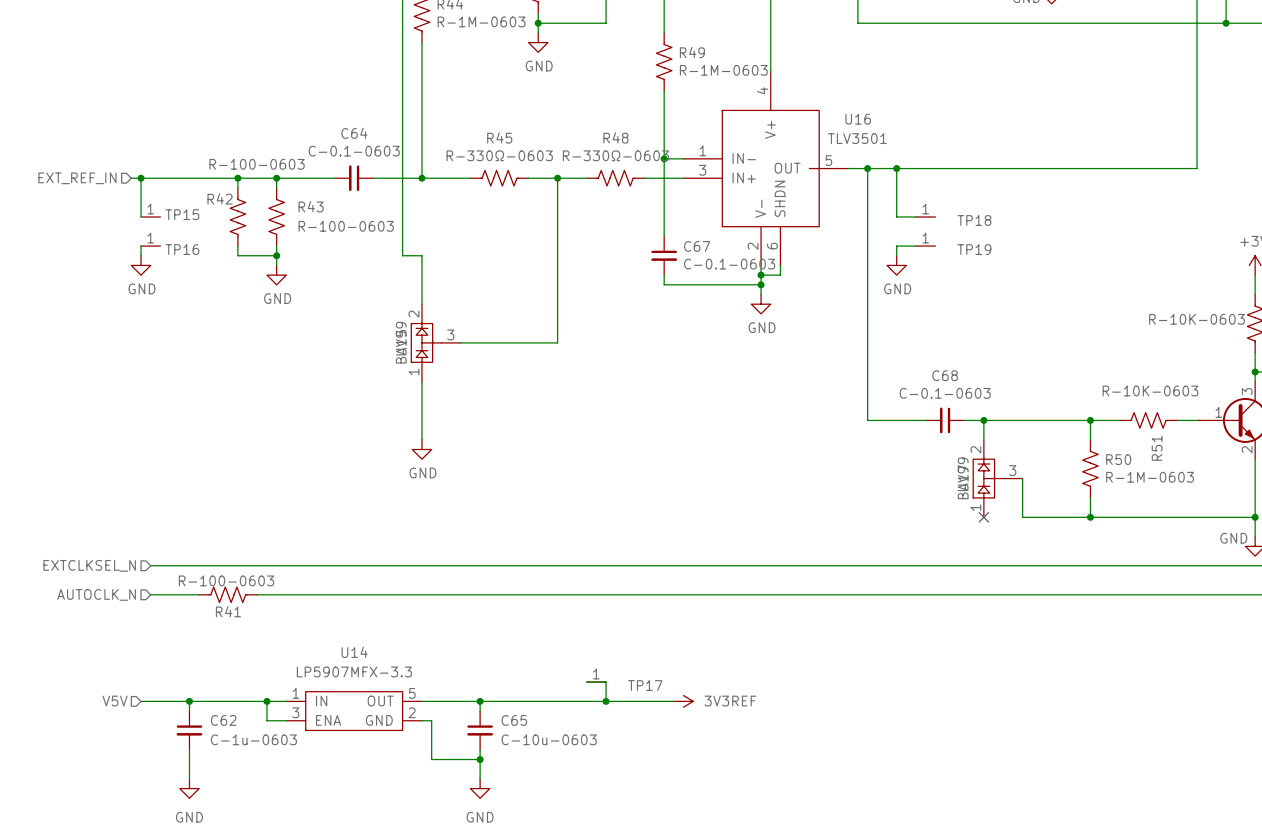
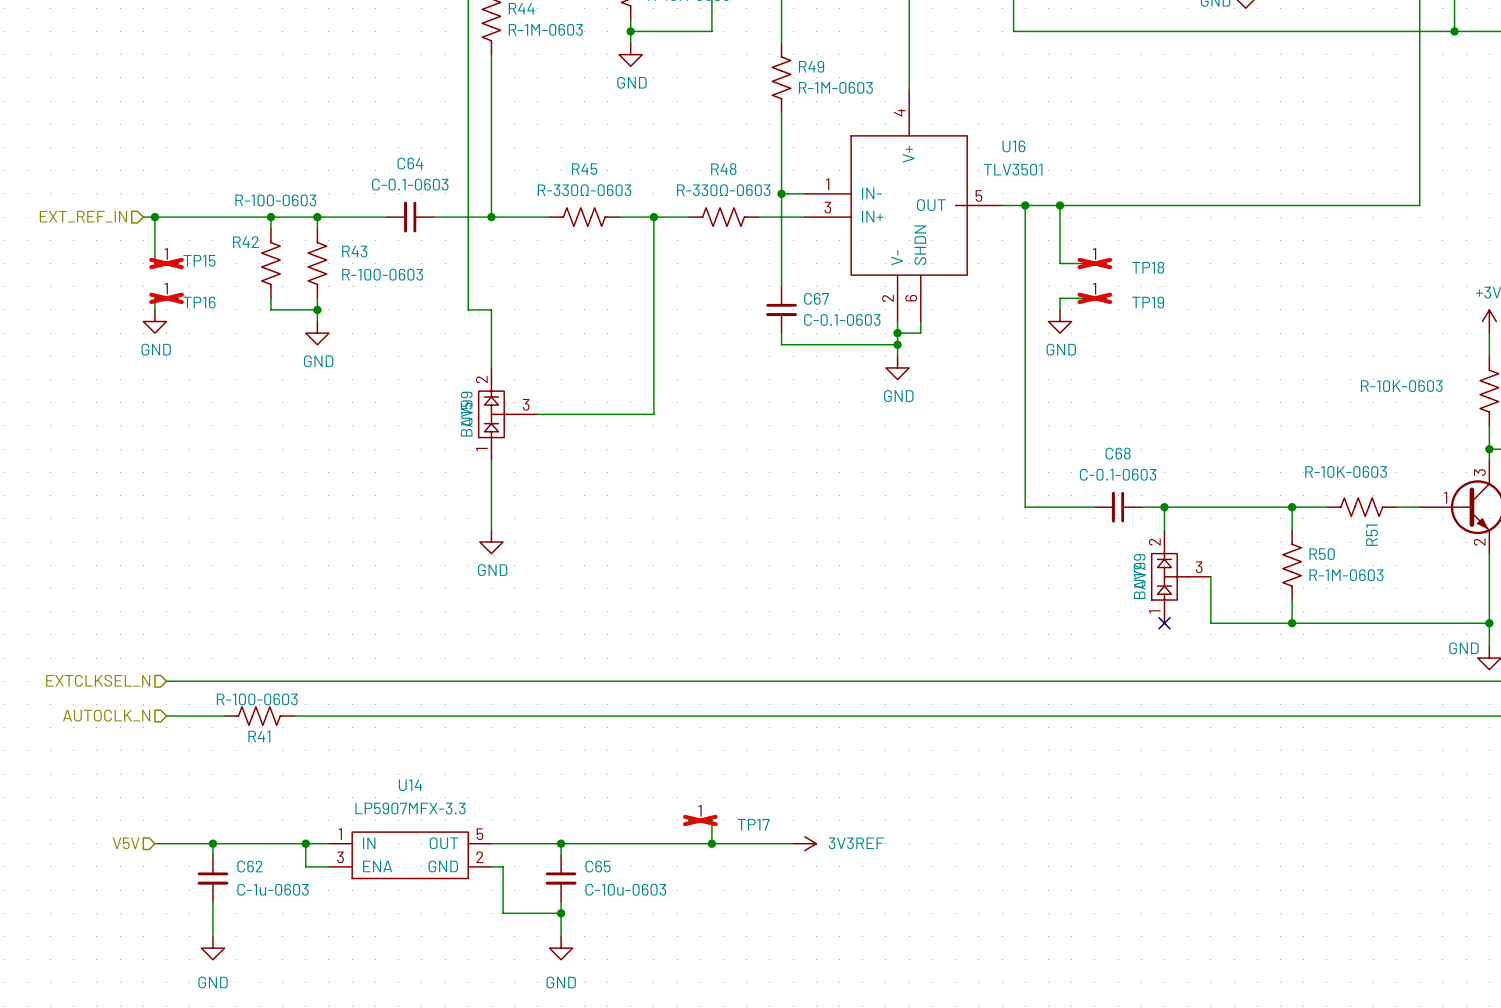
TP15 do-not-place cross: none -> (166, 263)
TP18 do-not-place cross: none -> (1094, 263)
TP16 do-not-place cross: none -> (166, 298)
TP19 do-not-place cross: none -> (1094, 298)
TP17 do-not-place cross: none -> (700, 820)

